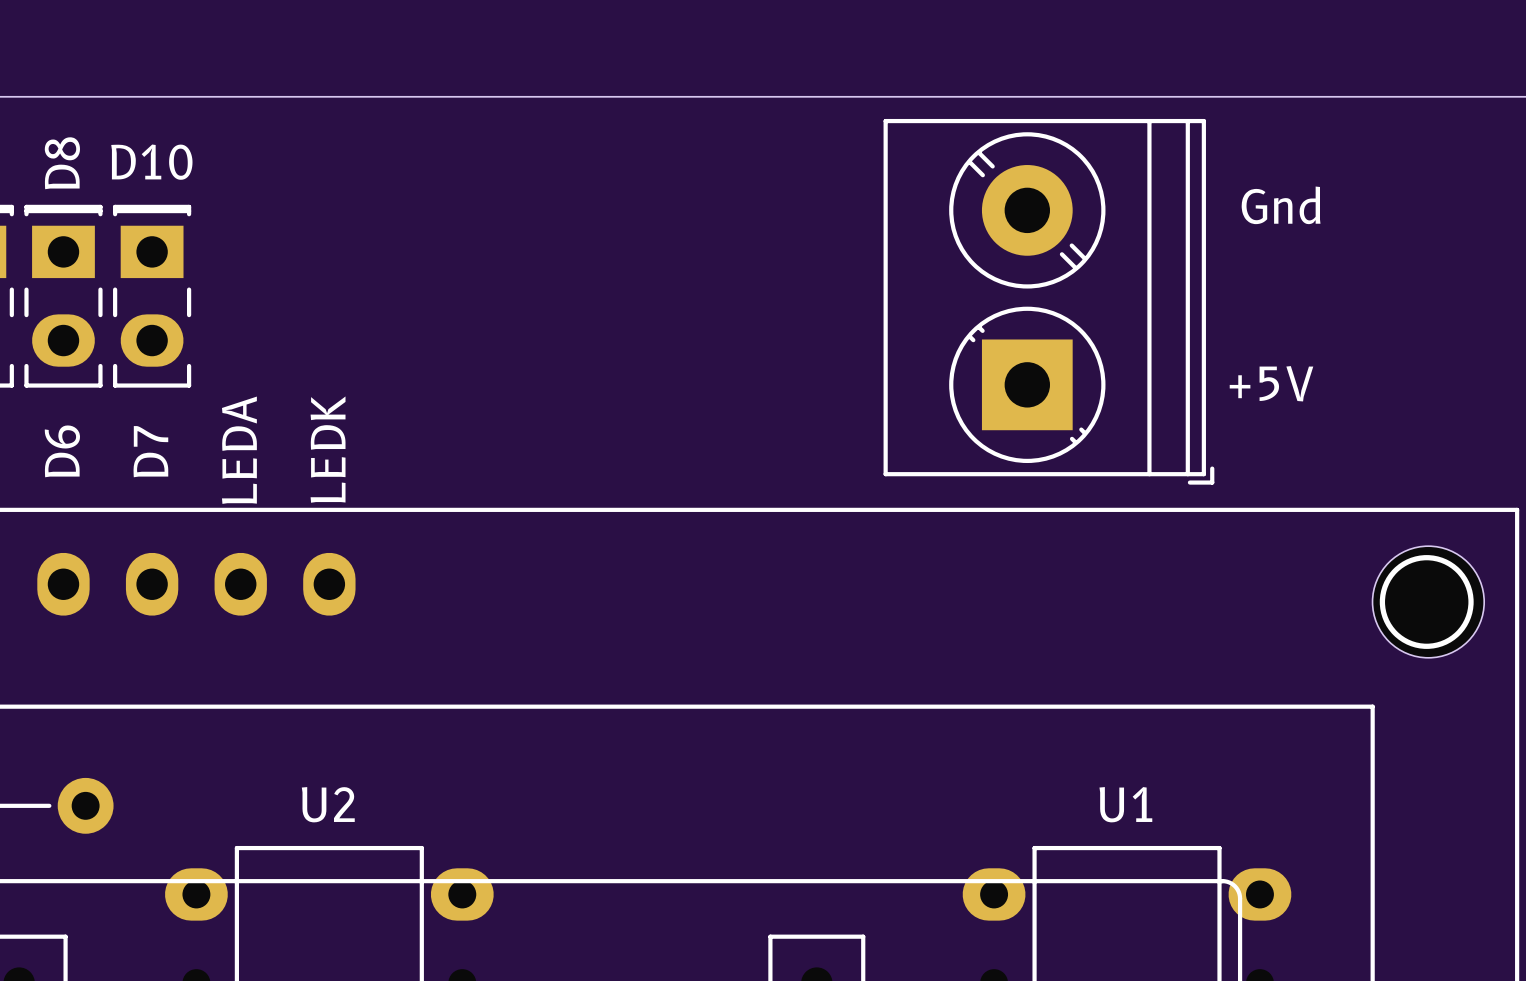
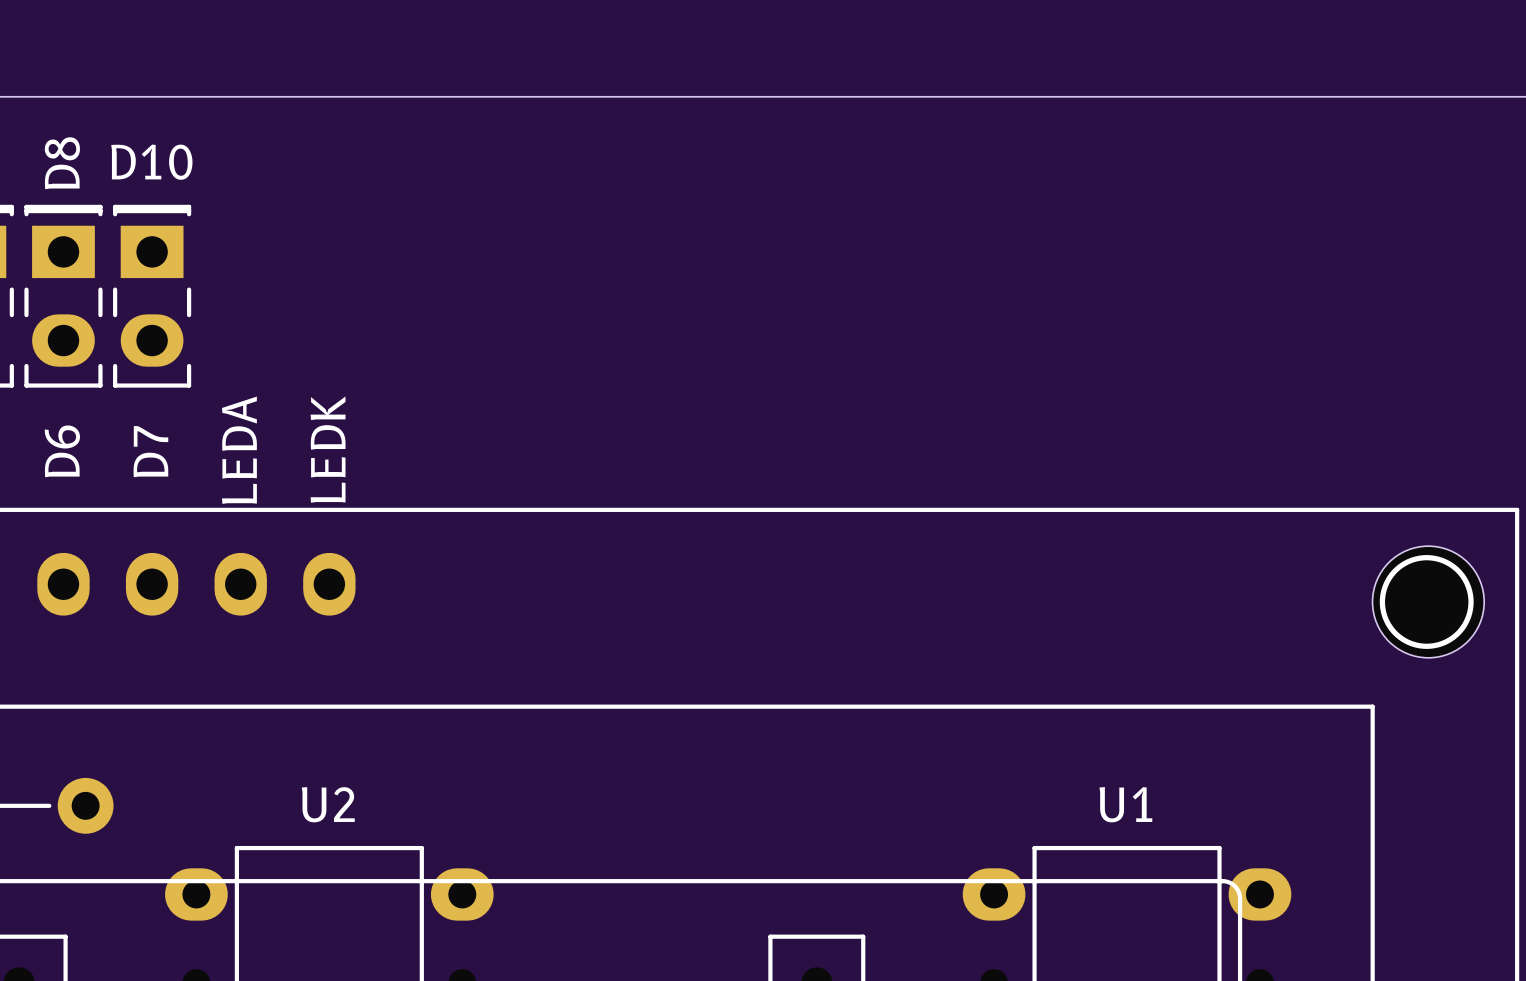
text: Gnd (1281, 205) -> none
part: (1048, 301) -> none
text: +5V (1271, 383) -> none

